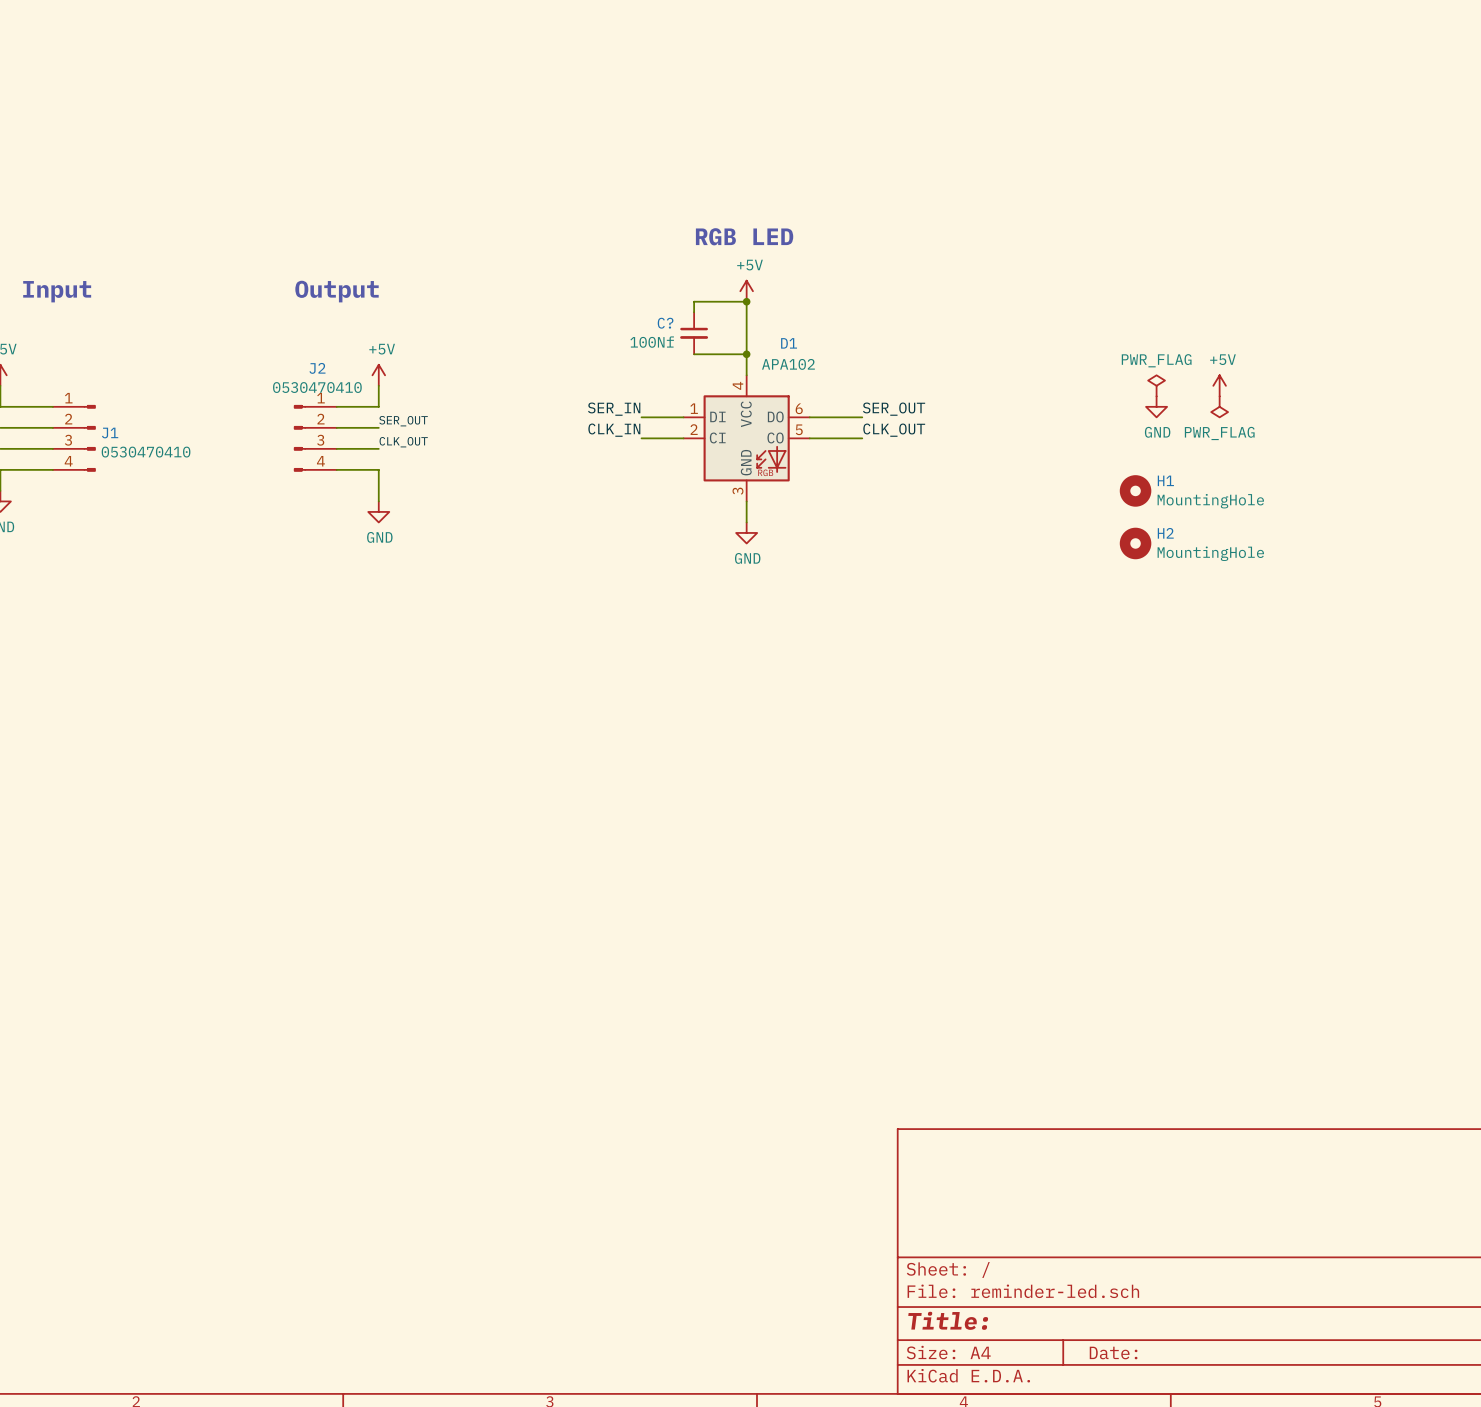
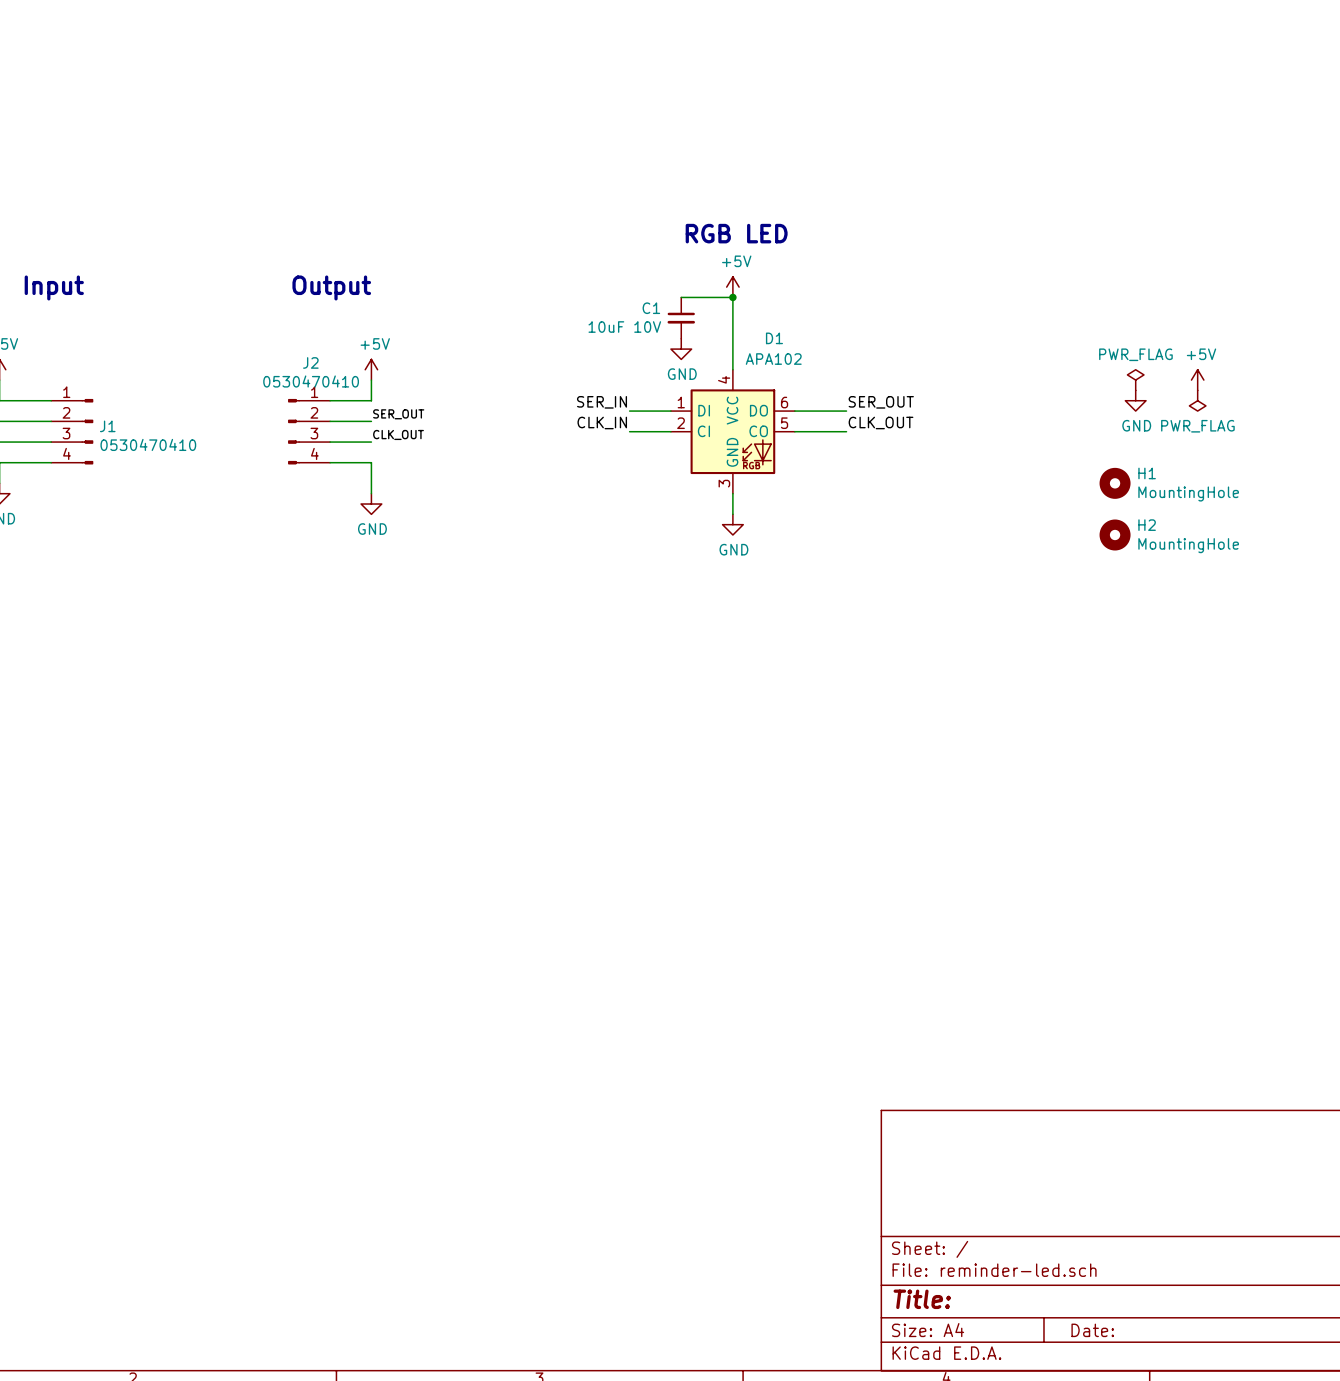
C1: none -> 10uF 10V (681, 318)
C?: 100Nf (694, 333) -> none
wire: (694, 354) (746, 354) -> none
power symbol: none -> GND (681, 349)
junction: (746, 354) -> none

